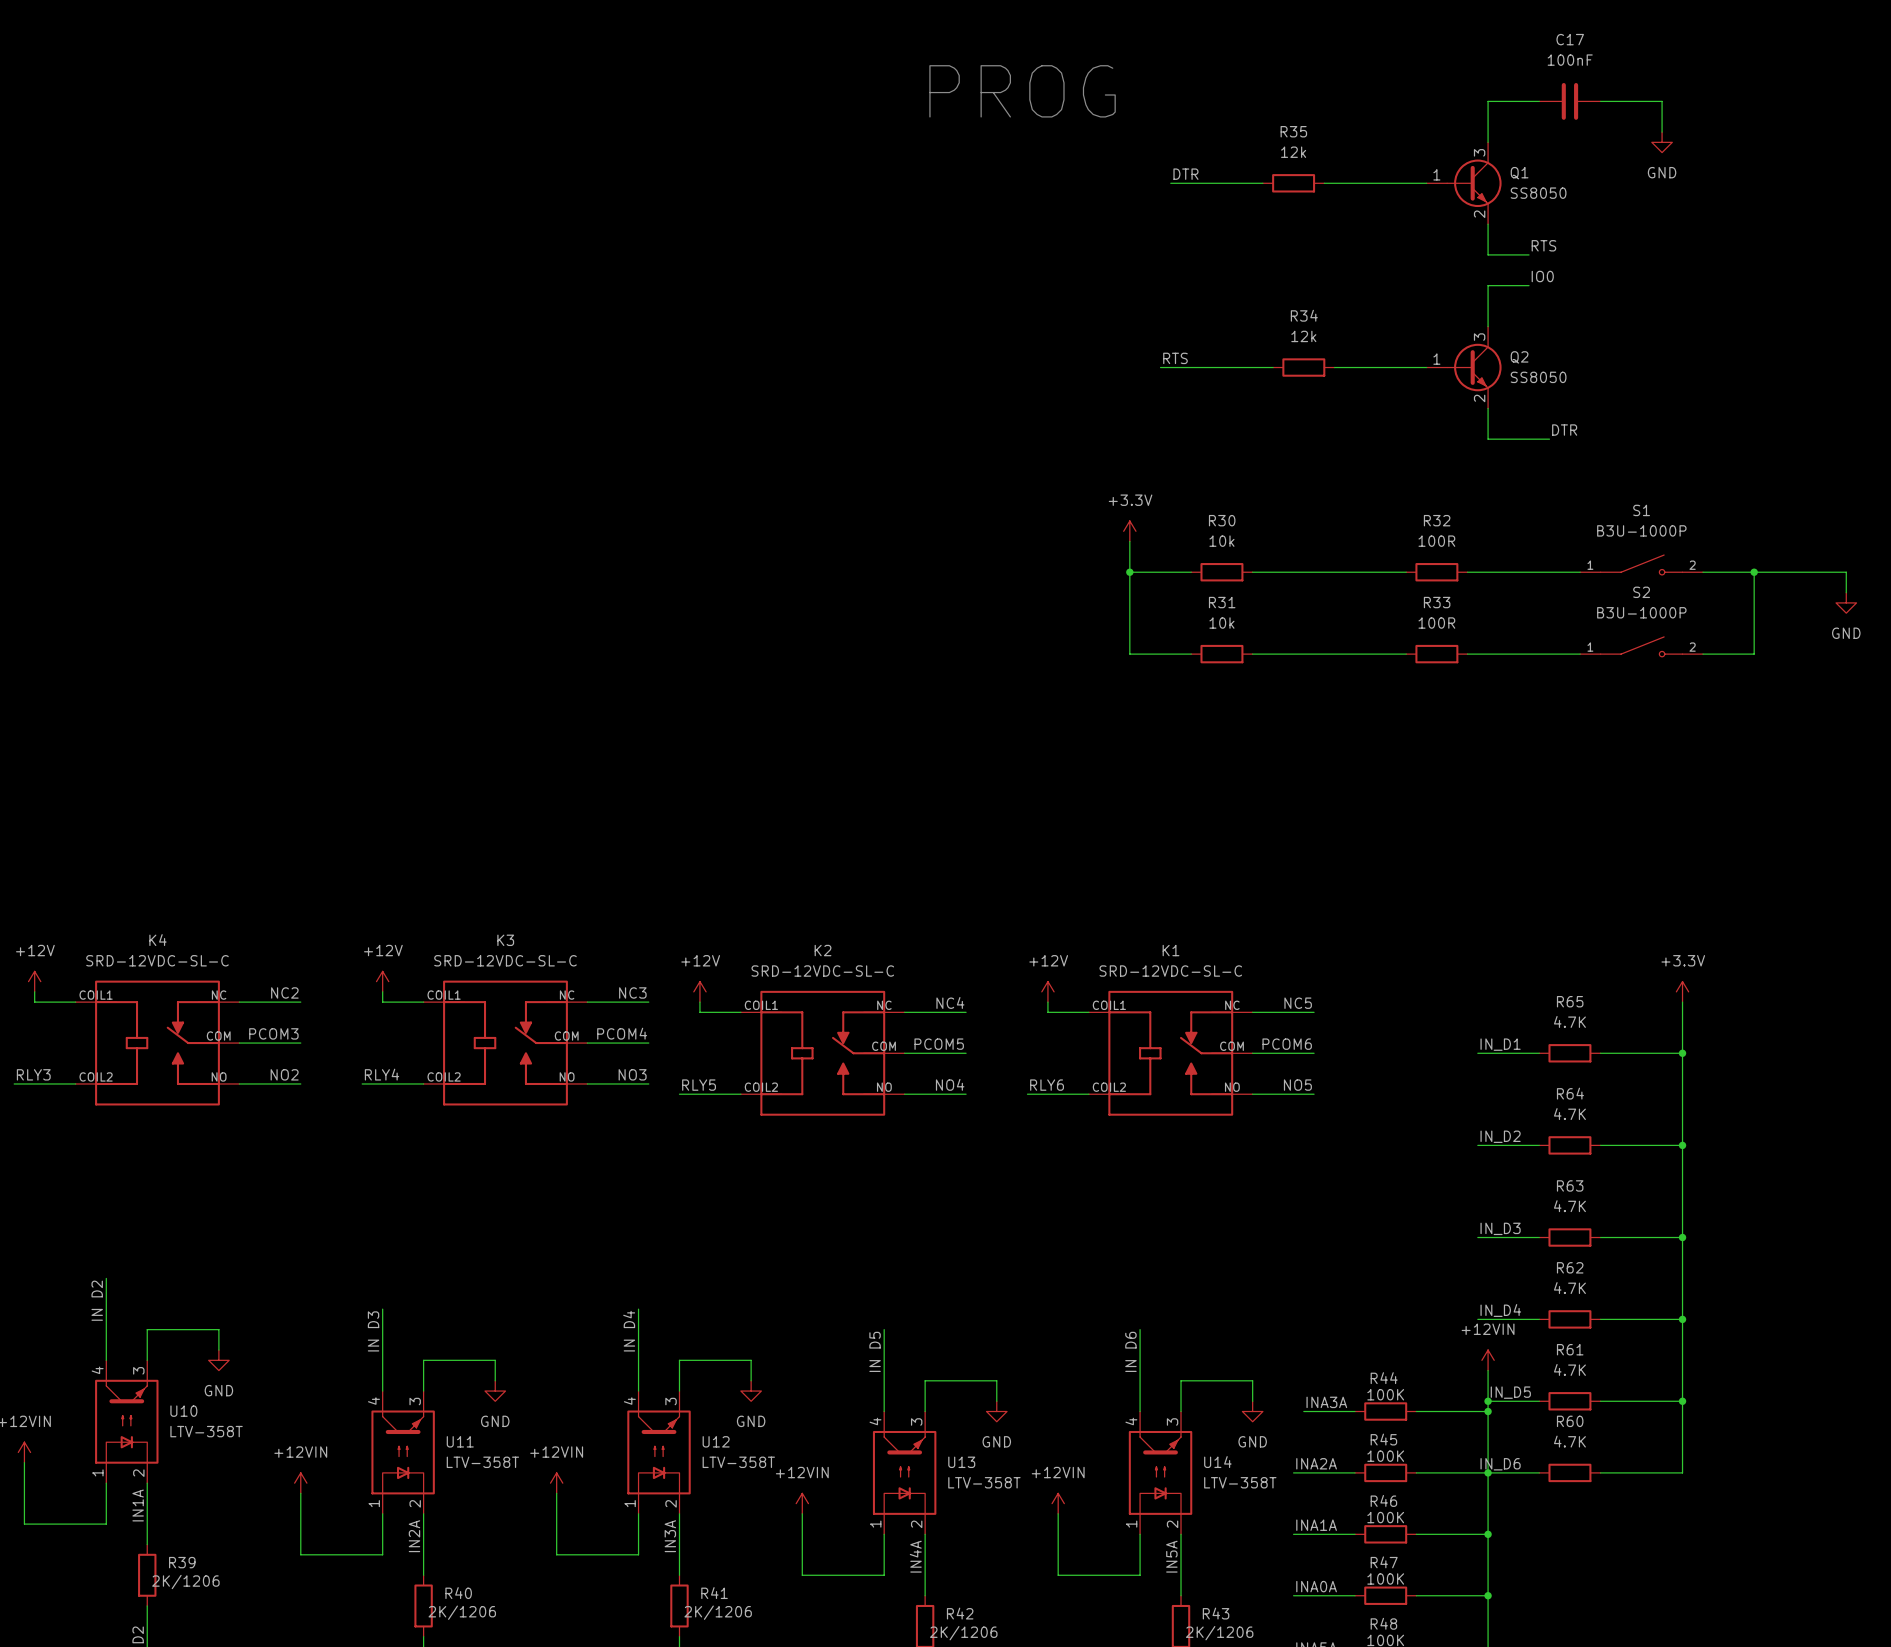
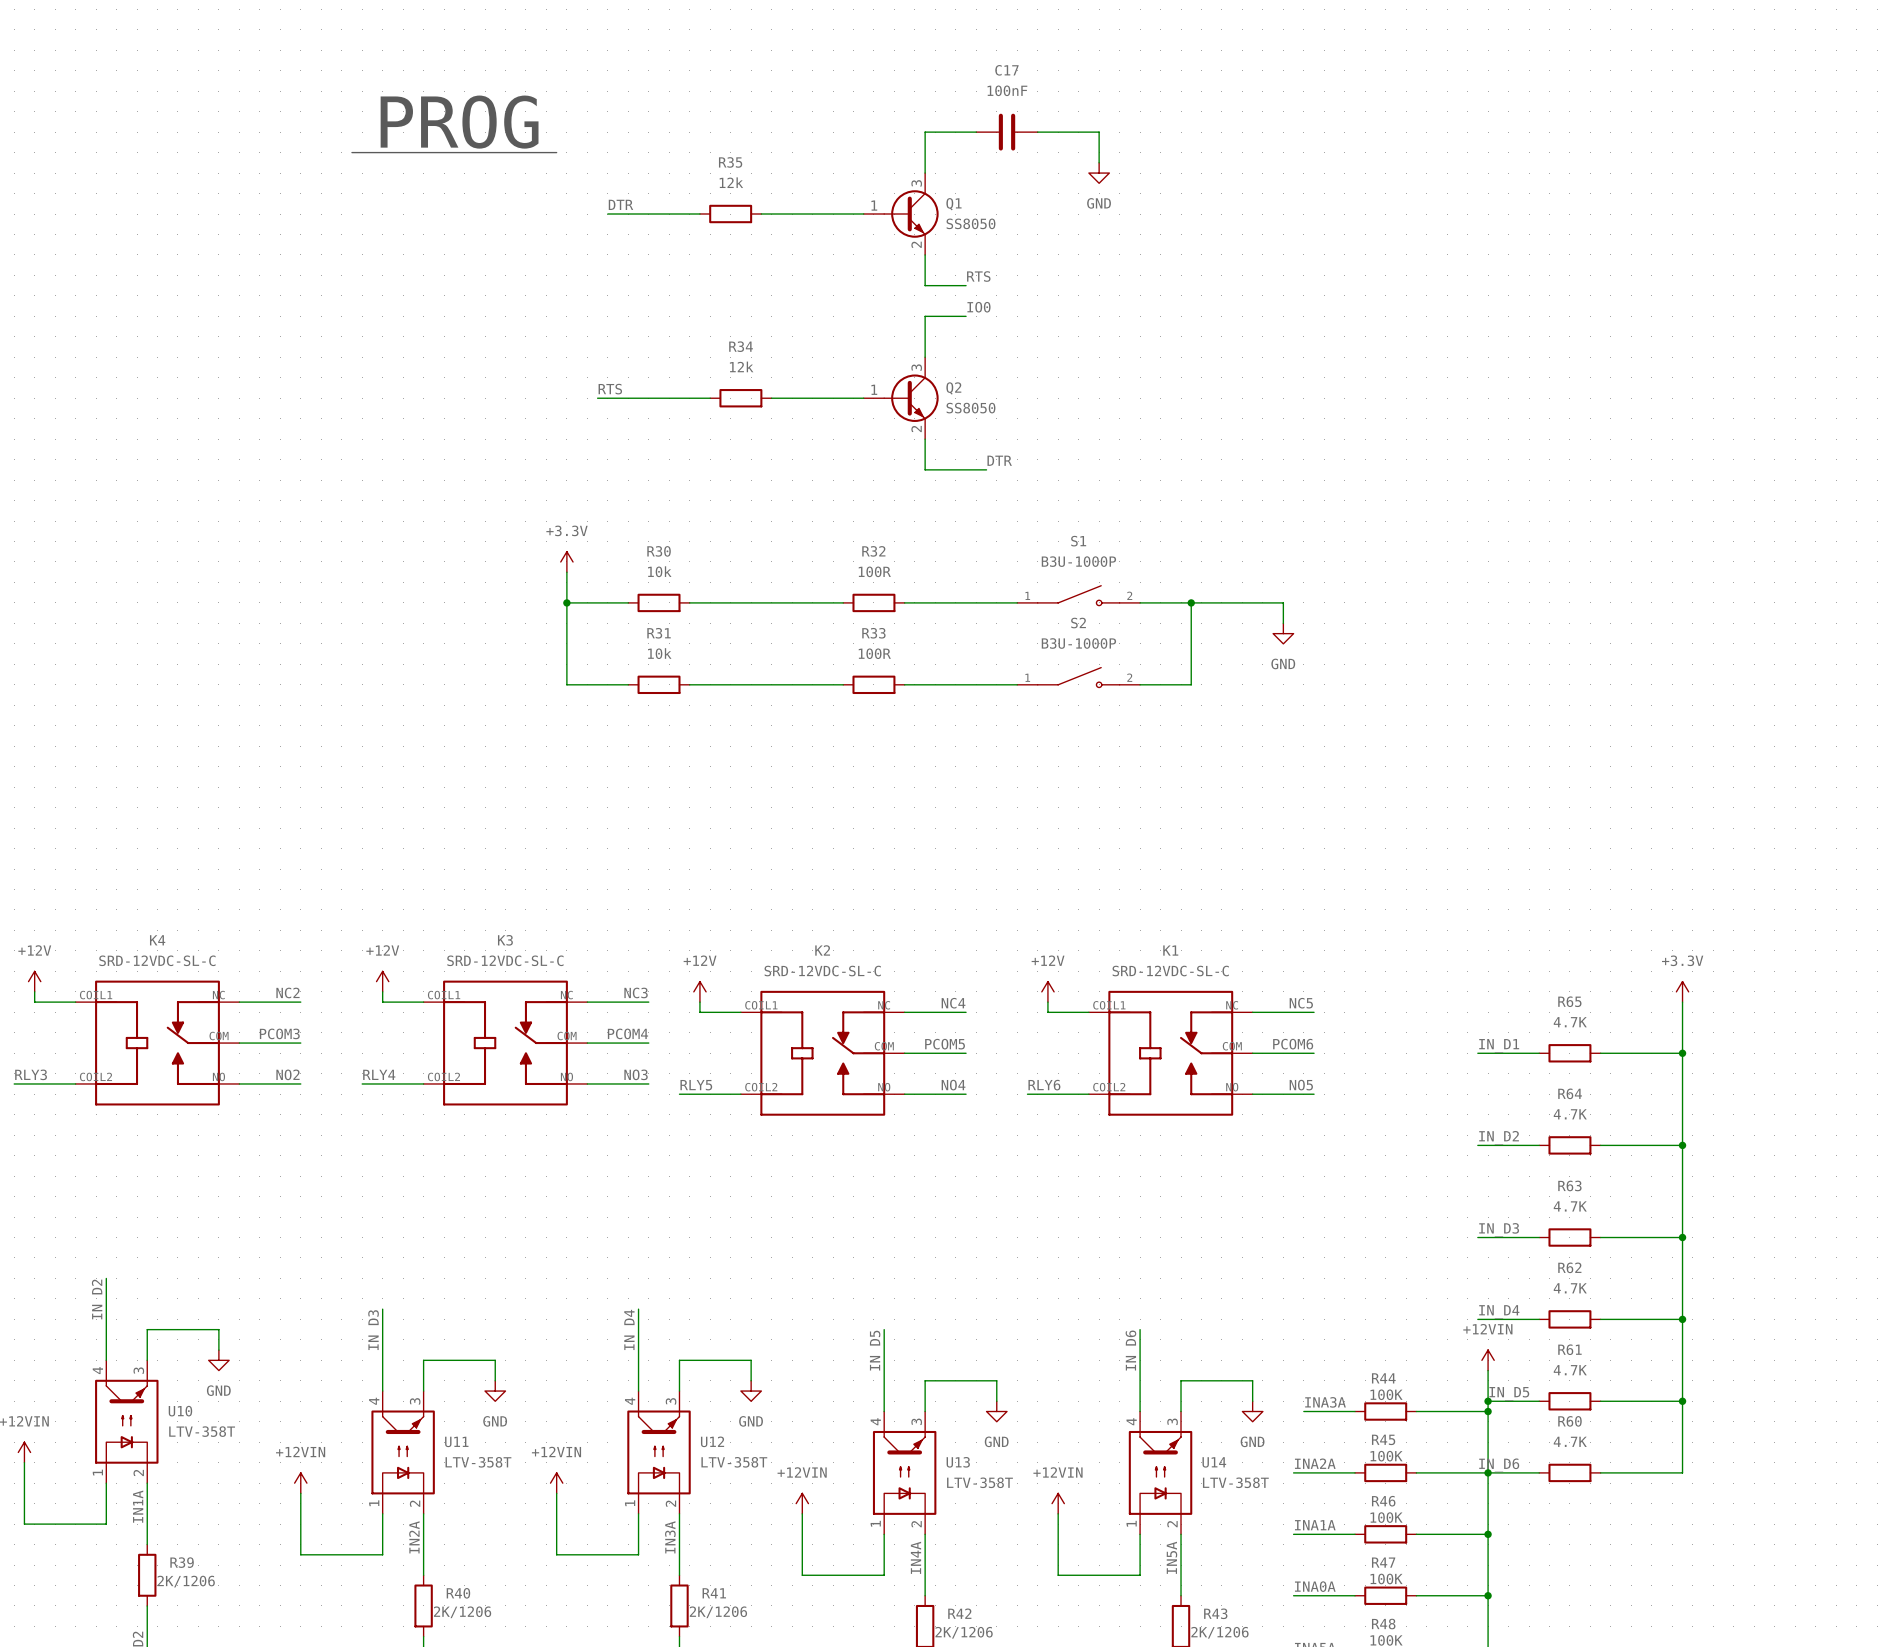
text: PROG (1022, 91) -> none
wire: (1539, 101) (1488, 101) (1488, 142) -> none
C17 position: (1569, 101) -> (1007, 132)
wire: (1600, 101) (1662, 101) (1662, 132) -> none
text: none -> PROG (459, 122)
wire: none -> (976, 132) (925, 132) (925, 173)
wire: none -> (1037, 132) (1099, 132) (1099, 162)
power symbol: GND (1662, 142) -> none
bus: none -> (351, 152) (556, 152)
power symbol: none -> GND (1099, 173)
label: DTR (1185, 174) -> none
wire: (1170, 183) (1262, 183) -> none
R35 position: (1293, 183) -> (730, 214)
wire: (1324, 183) (1426, 183) -> none
Q1 position: (1464, 183) -> (901, 214)
label: none -> DTR (620, 204)
wire: none -> (607, 214) (699, 214)
wire: none -> (761, 214) (863, 214)
wire: (1488, 224) (1488, 254) (1529, 254) -> none
label: RTS (1543, 245) -> none
wire: none -> (925, 254) (925, 285) (966, 285)
label: none -> RTS (978, 276)
label: IO0 (1542, 276) -> none
wire: (1529, 285) (1488, 285) (1488, 326) -> none
label: none -> IO0 (978, 307)
wire: none -> (966, 316) (925, 316) (925, 357)
label: RTS (1175, 358) -> none
wire: (1160, 367) (1273, 367) -> none
R34 position: (1303, 367) -> (740, 398)
wire: (1334, 367) (1426, 367) -> none
Q2 position: (1464, 367) -> (901, 398)
label: none -> RTS (610, 389)
wire: none -> (597, 398) (710, 398)
wire: none -> (771, 398) (863, 398)
wire: (1488, 408) (1488, 439) (1549, 439) -> none
label: DTR (1564, 430) -> none
wire: none -> (925, 439) (925, 469) (986, 469)
label: none -> DTR (999, 460)
power symbol: +3.3V (1129, 531) -> none
wire: (1129, 541) (1129, 654) (1191, 654) -> none
power symbol: none -> +3.3V (566, 561)
S1 position: (1641, 564) -> (1078, 595)
wire: none -> (566, 572) (566, 684) (628, 684)
wire: (1129, 572) (1191, 572) -> none
junction: (1129, 572) -> none
R30 position: (1221, 572) -> (659, 602)
wire: (1252, 572) (1406, 572) -> none
R32 position: (1436, 572) -> (873, 602)
wire: (1467, 572) (1580, 572) -> none
wire: (1703, 572) (1846, 572) (1846, 592) -> none
wire: (1754, 572) (1754, 654) (1703, 654) -> none
junction: (1754, 572) -> none
wire: none -> (566, 602) (628, 602)
junction: none -> (566, 602)
wire: none -> (689, 602) (843, 602)
wire: none -> (904, 602) (1017, 602)
wire: none -> (1140, 602) (1283, 602) (1283, 623)
wire: none -> (1191, 602) (1191, 684) (1140, 684)
junction: none -> (1191, 602)
power symbol: GND (1846, 602) -> none
power symbol: none -> GND (1283, 633)
S2 position: (1641, 646) -> (1078, 677)
R31 position: (1221, 654) -> (659, 684)
wire: (1252, 654) (1406, 654) -> none
R33 position: (1436, 654) -> (873, 684)
wire: (1467, 654) (1580, 654) -> none
wire: none -> (689, 684) (843, 684)
wire: none -> (904, 684) (1017, 684)

